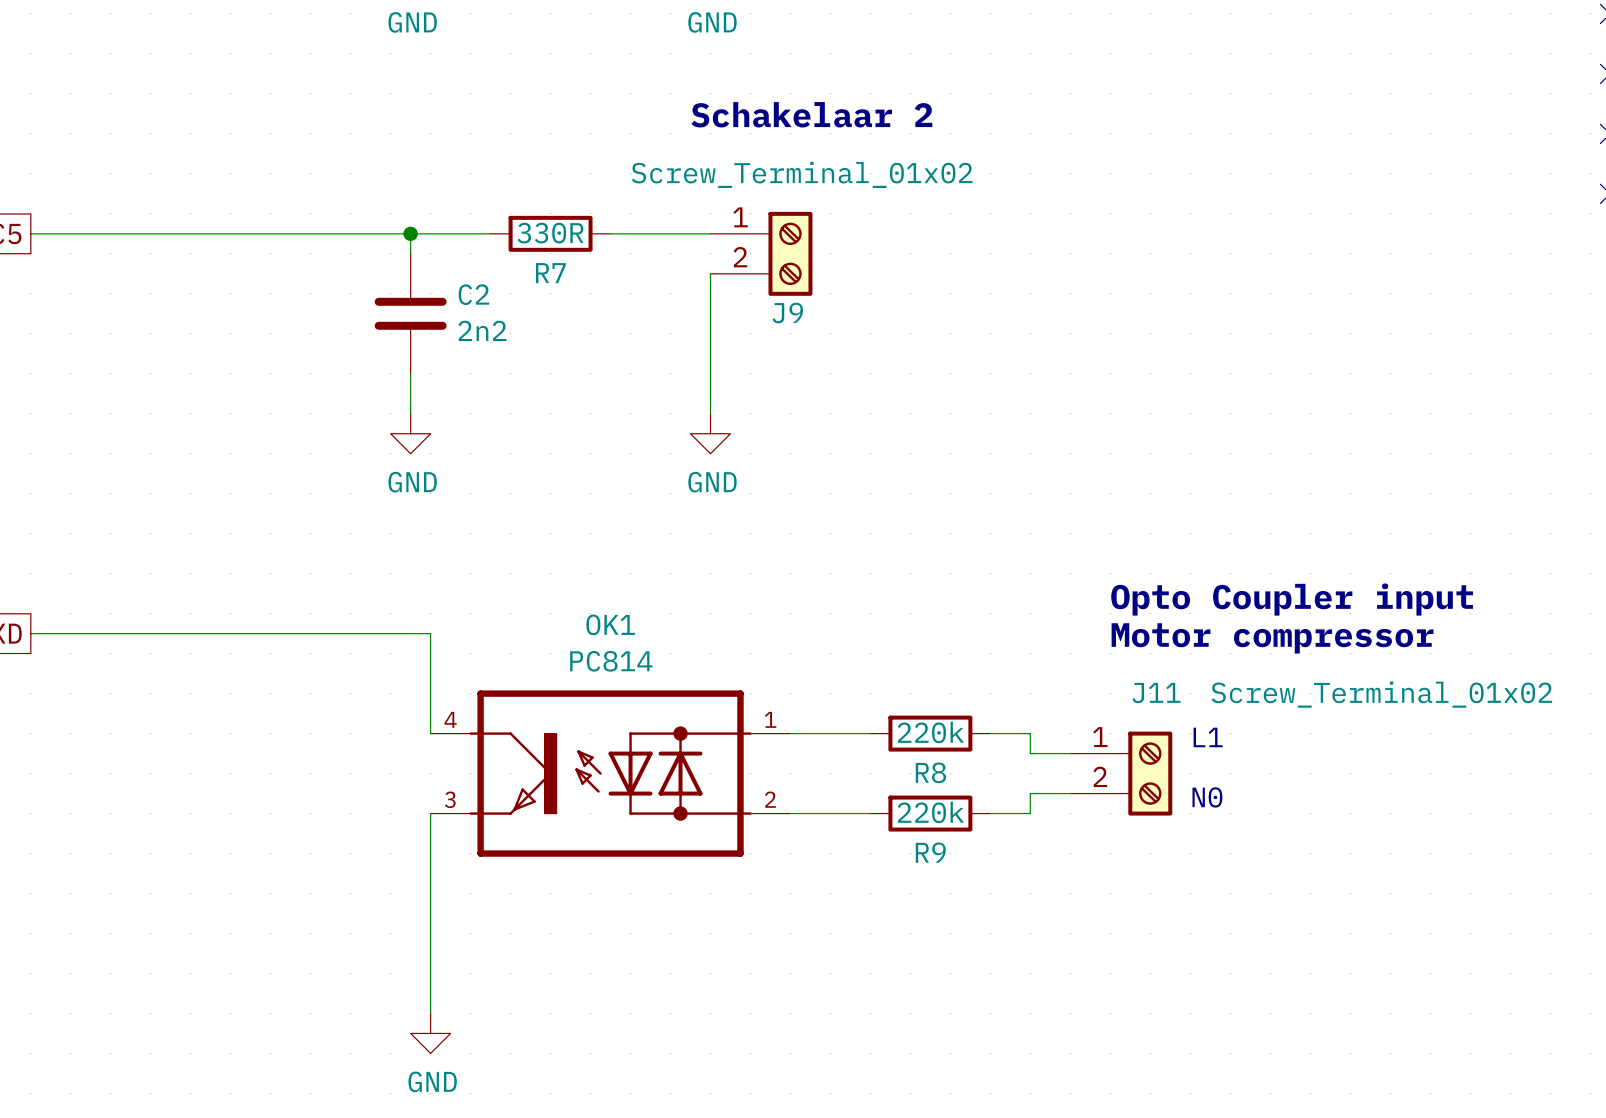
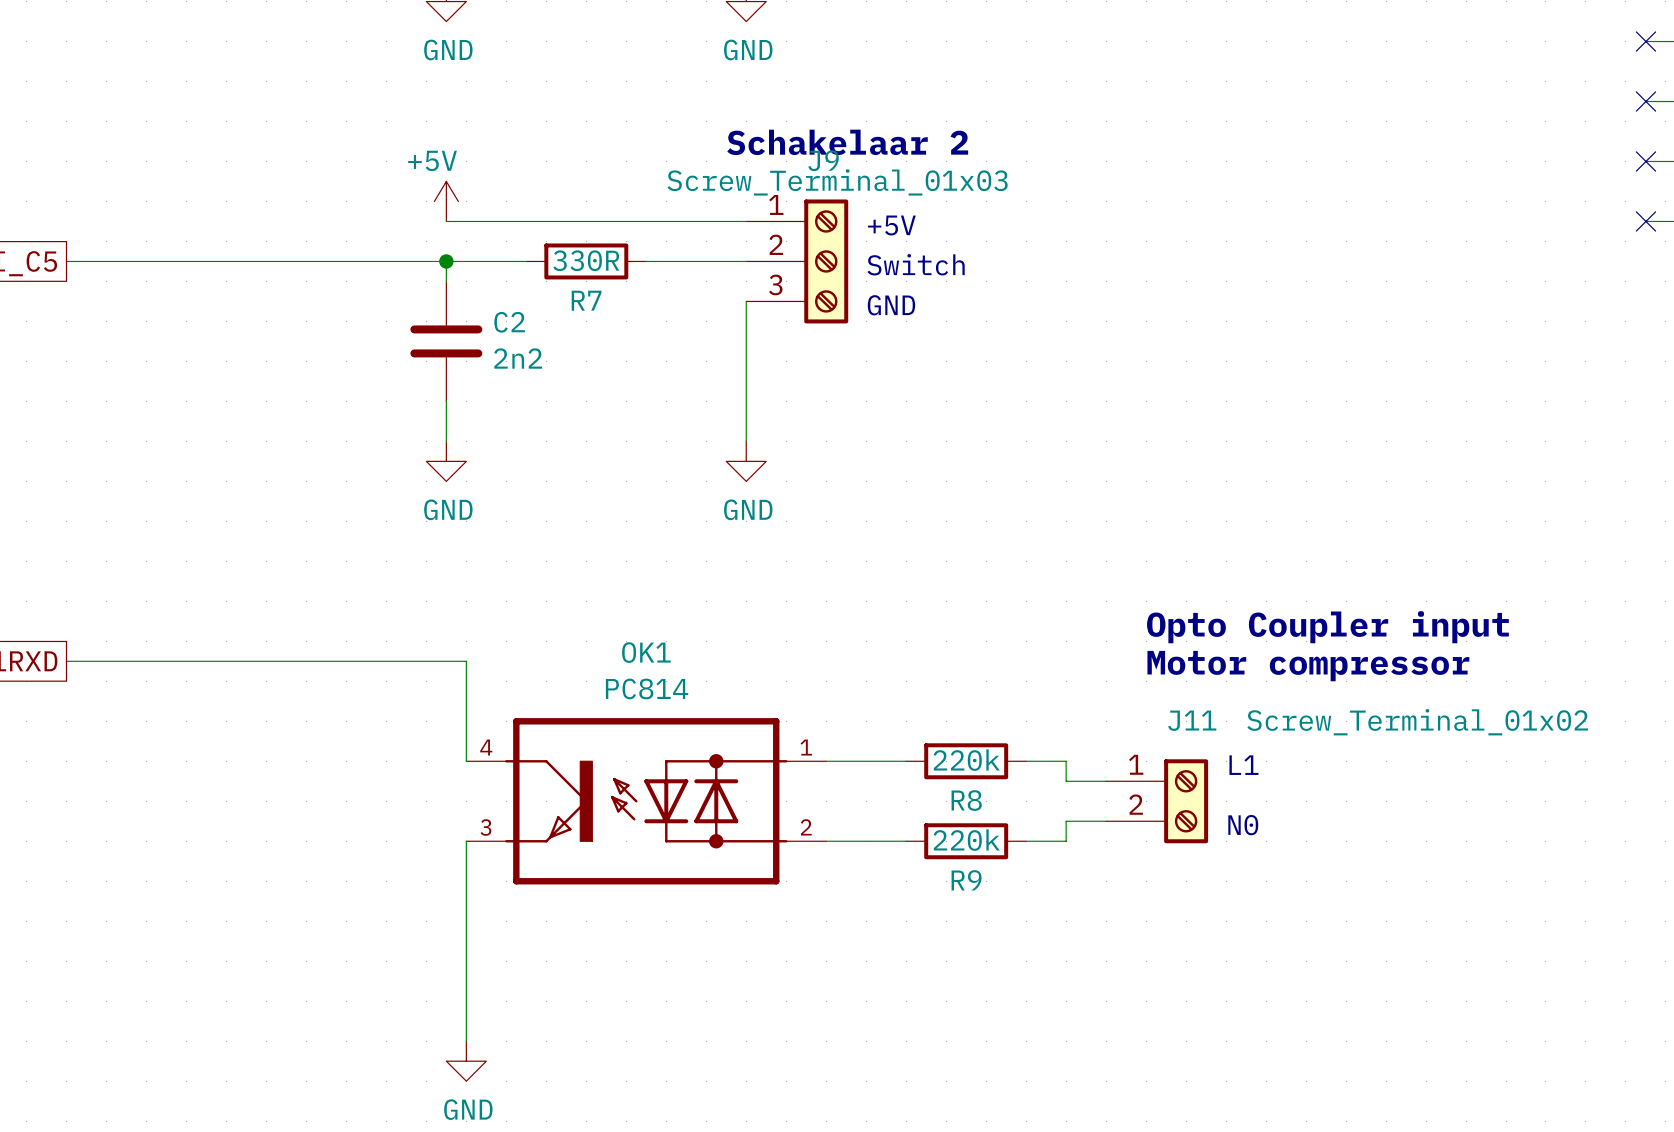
power symbol: none -> +5V (446, 201)
J9 value: Screw_Terminal_01x02 (802, 174) -> Screw_Terminal_01x03 (837, 182)
wire: none -> (446, 221) (746, 221)
text: none -> +5V (891, 225)
J9 symbol: [710, 211, 813, 296] -> [746, 199, 849, 324]
text: none -> Switch (916, 264)
text: none -> GND (891, 305)
J9 name position: J9 (787, 313) -> J9 (823, 160)

